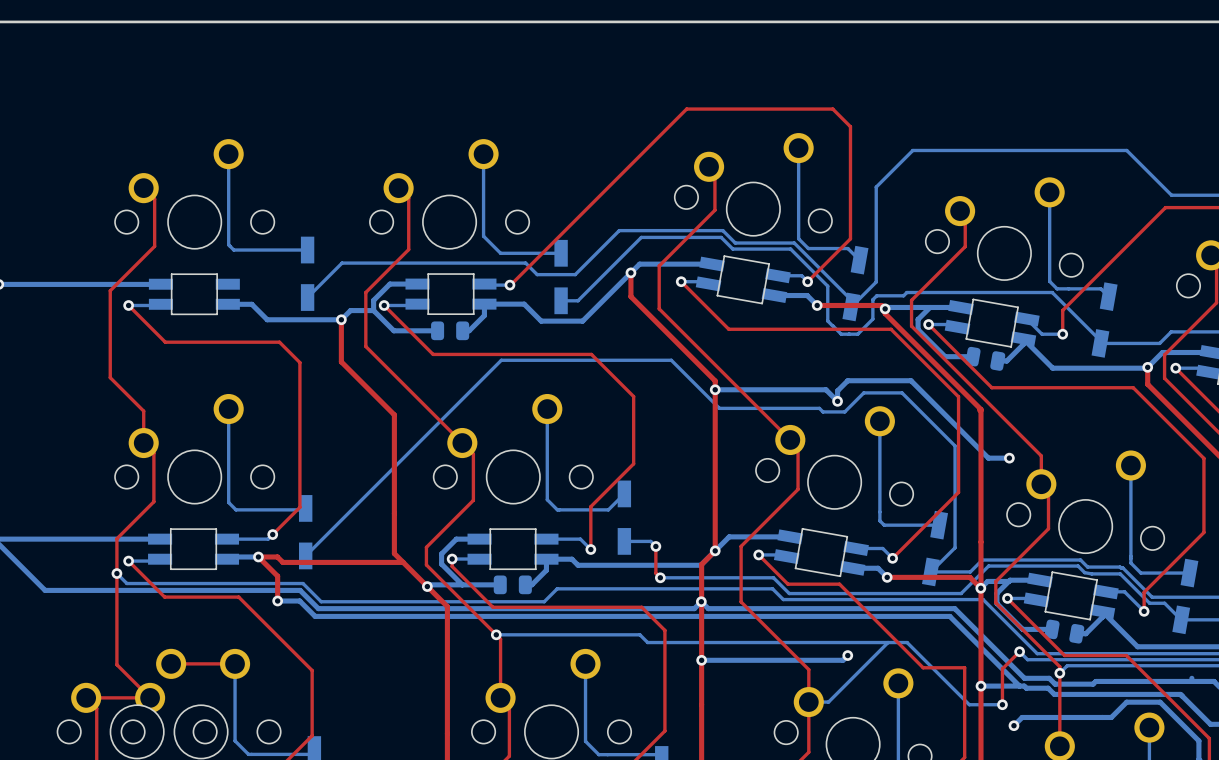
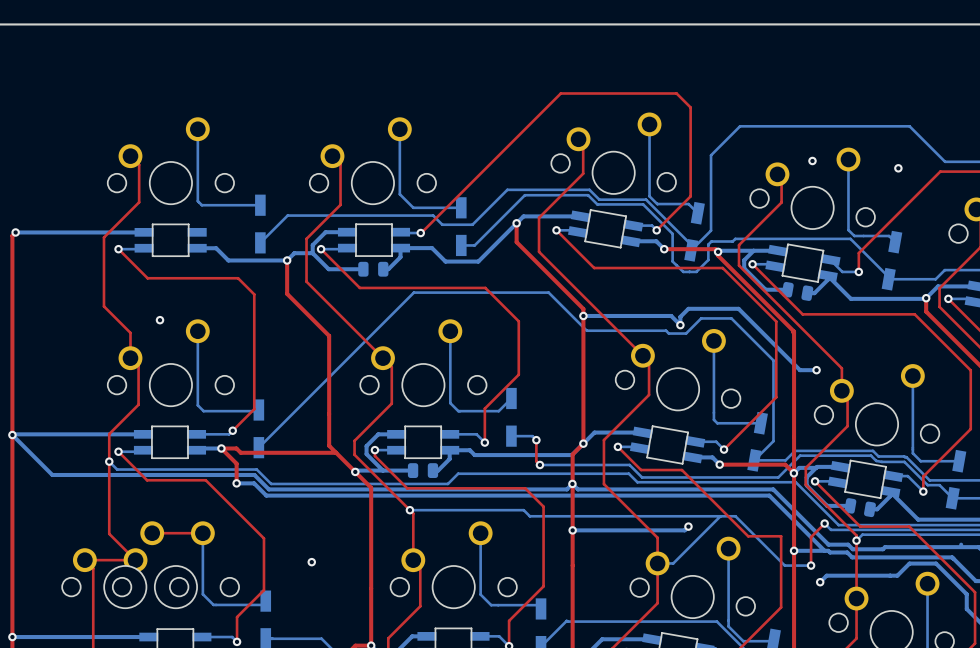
via: none -> (812, 160)
via: none -> (898, 168)
via: none -> (160, 320)
via: none -> (311, 562)

